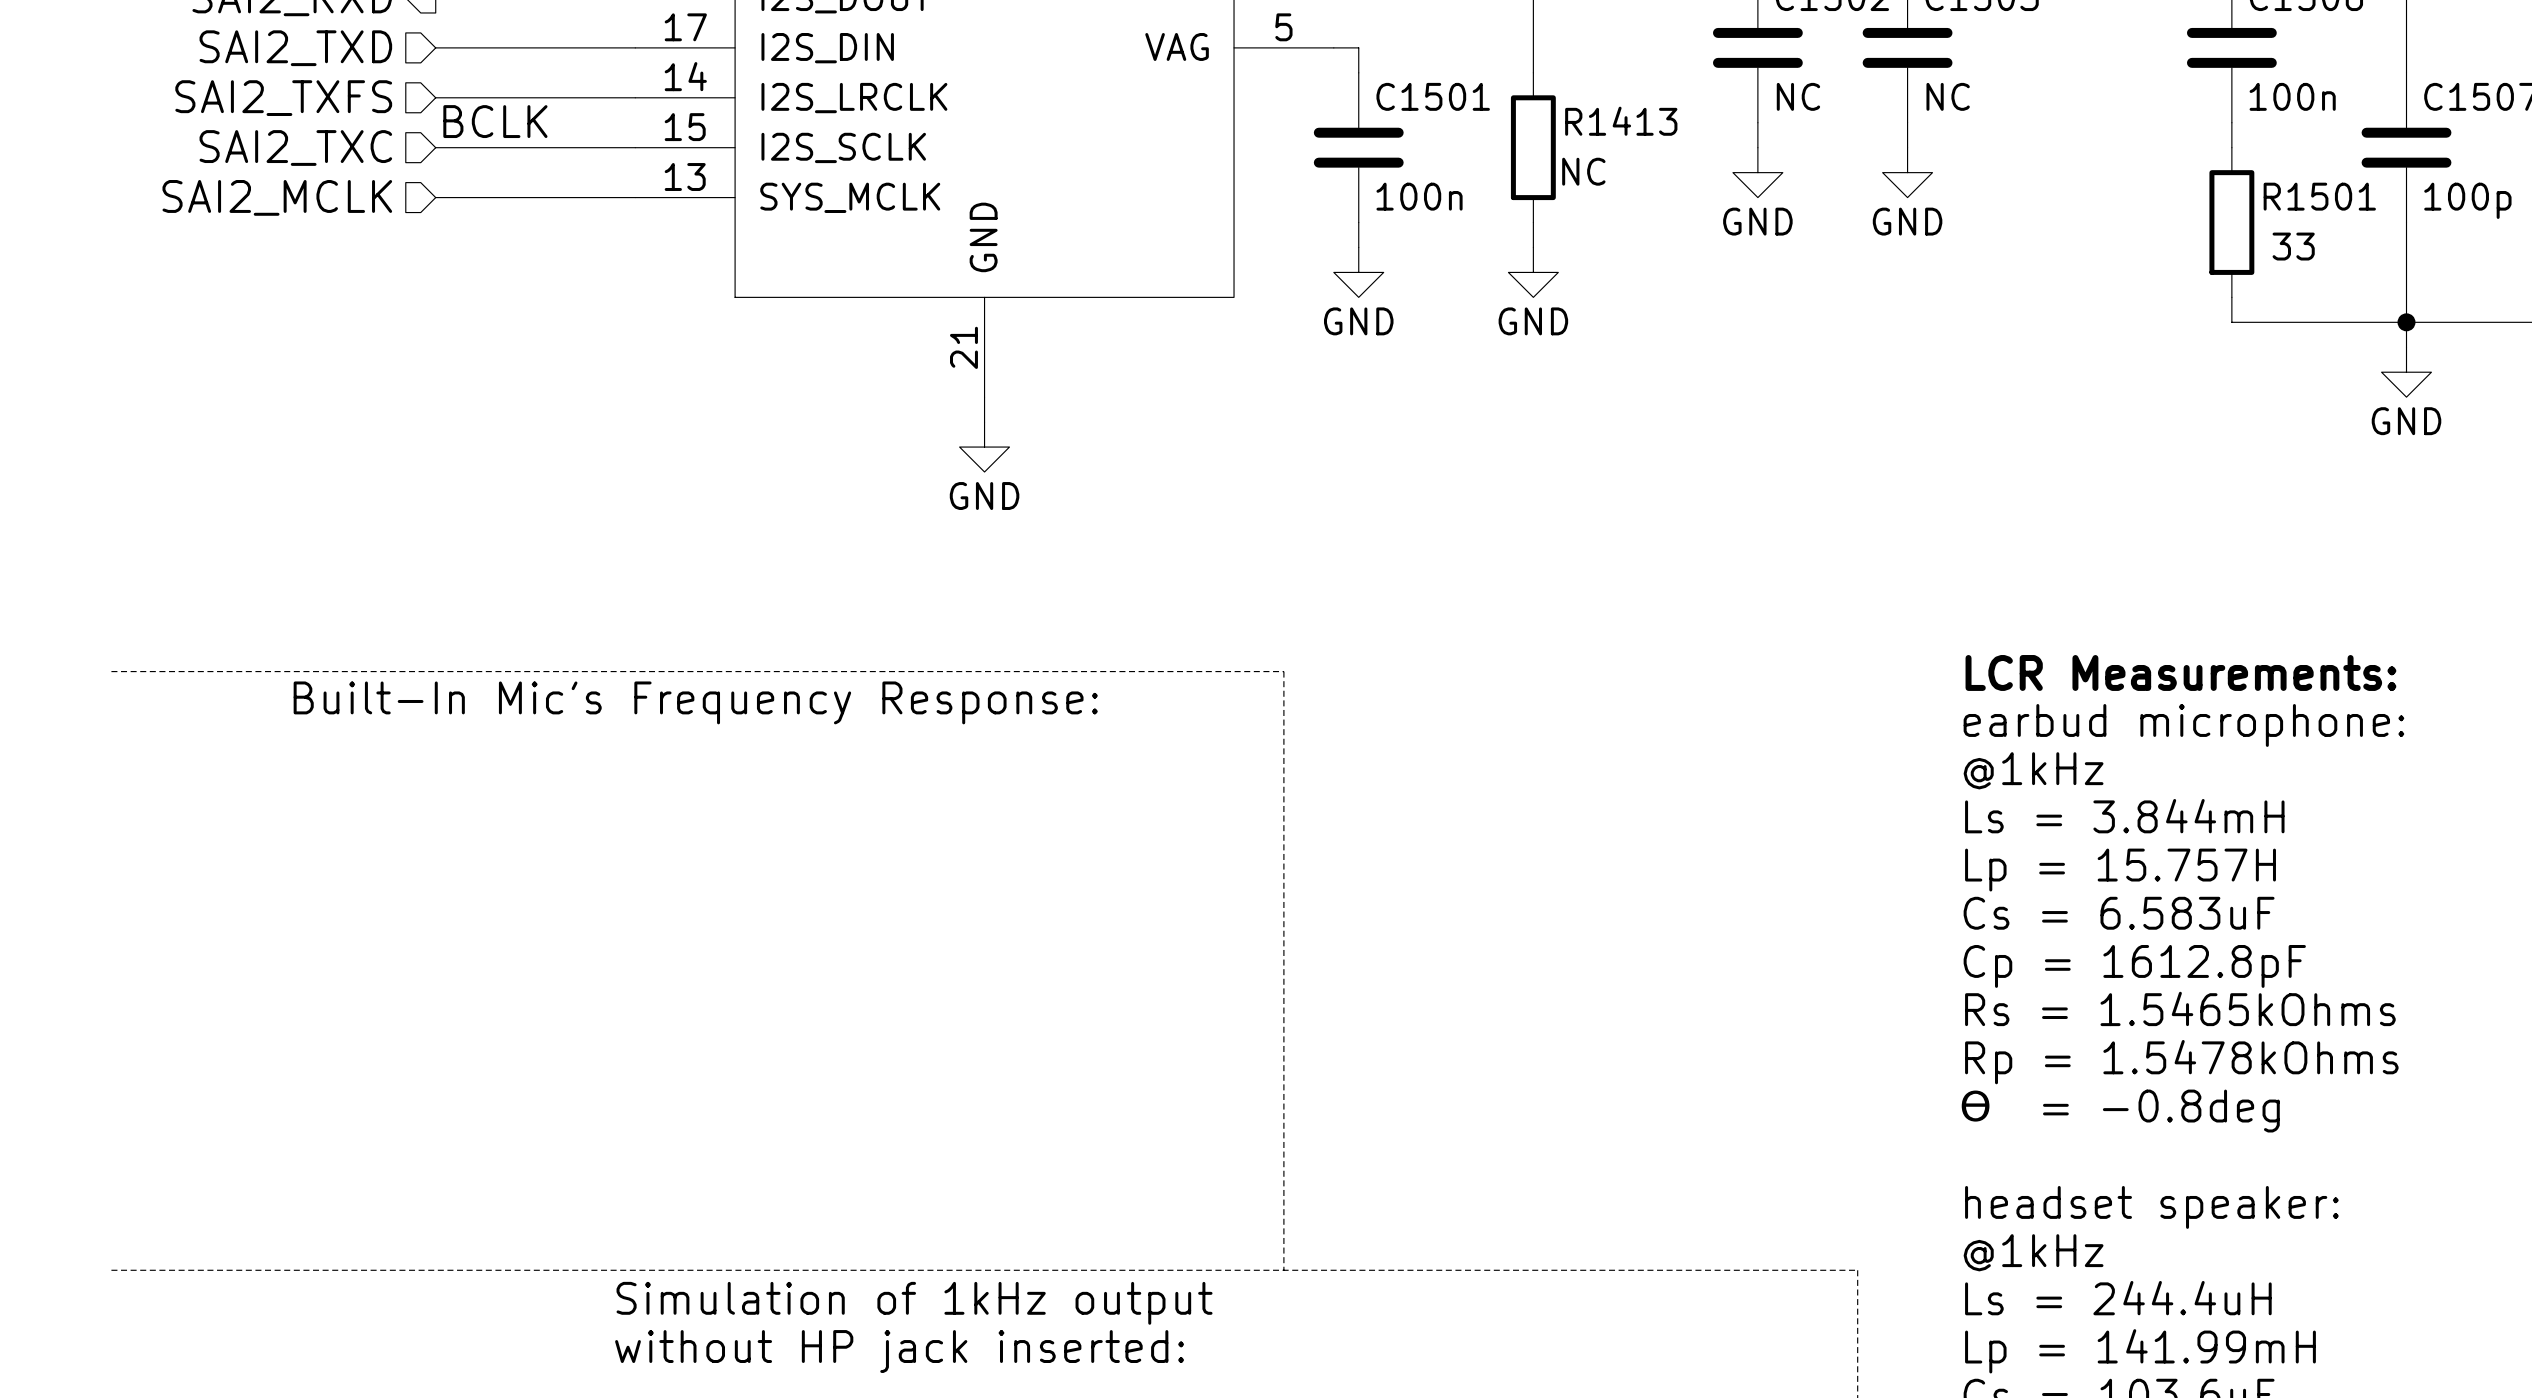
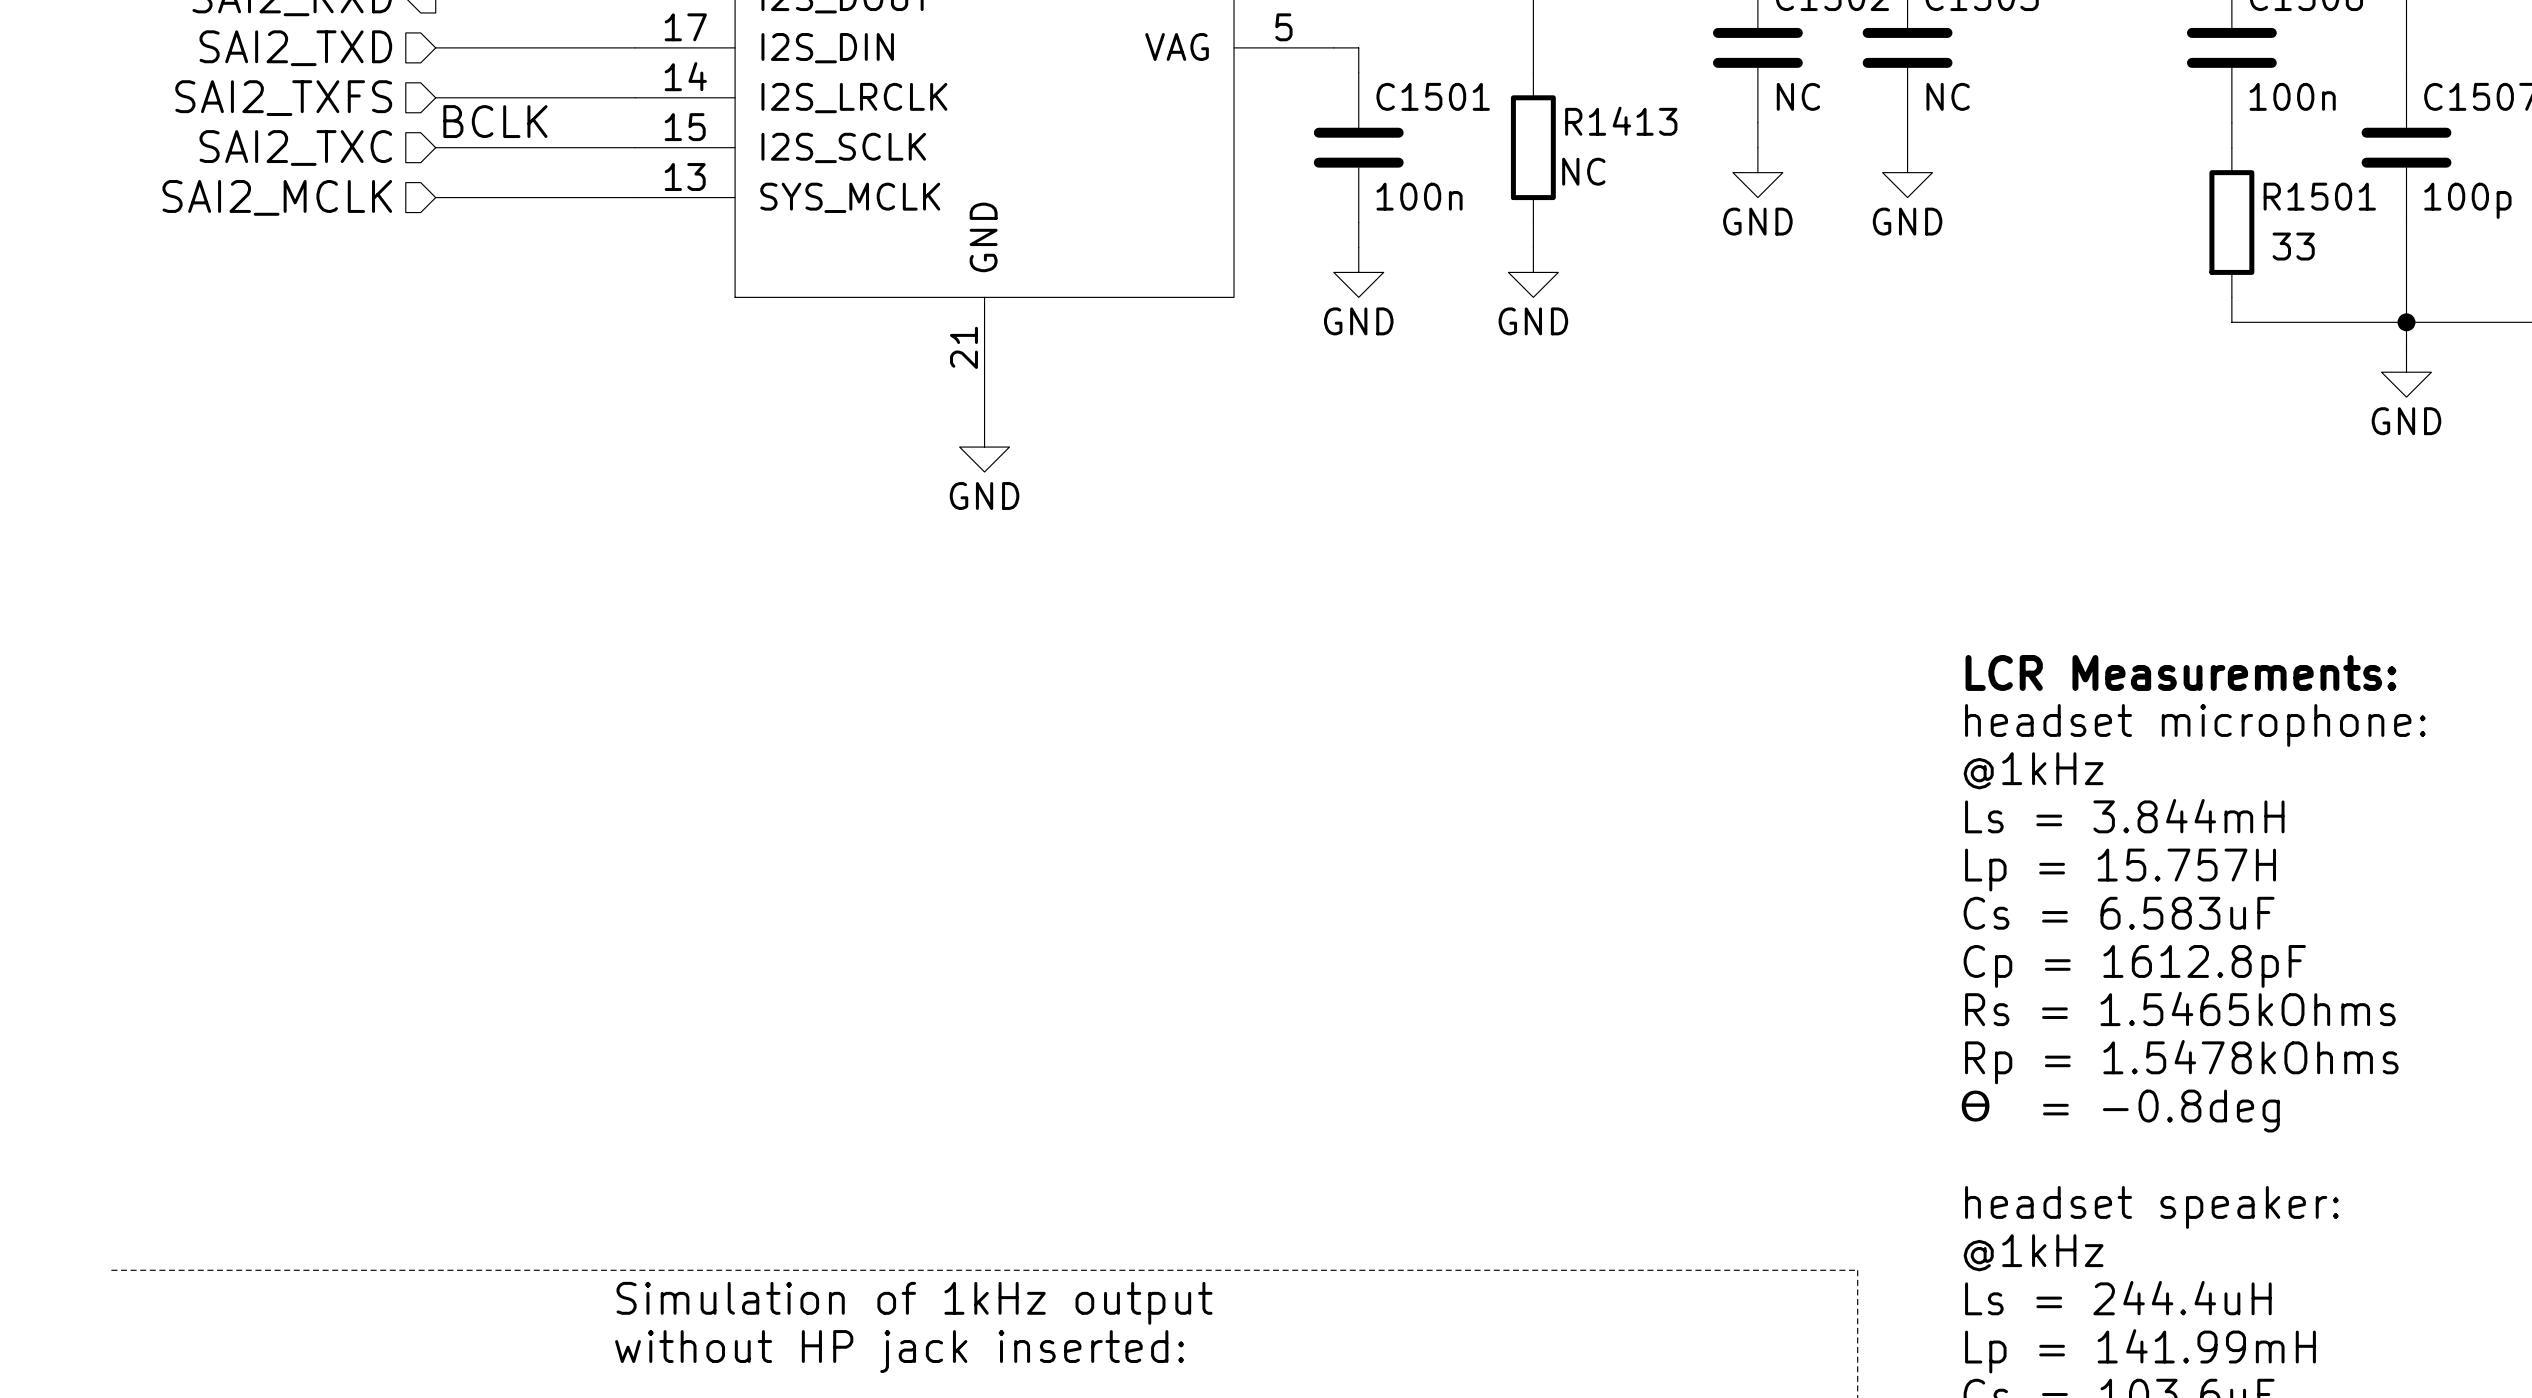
line: (111, 671) (1283, 671) (1283, 1270) -> none
text: Built-In Mic's Frequency Response: (695, 702) -> none
text: earbud microphone: (2183, 725) -> headset microphone: (2195, 725)

